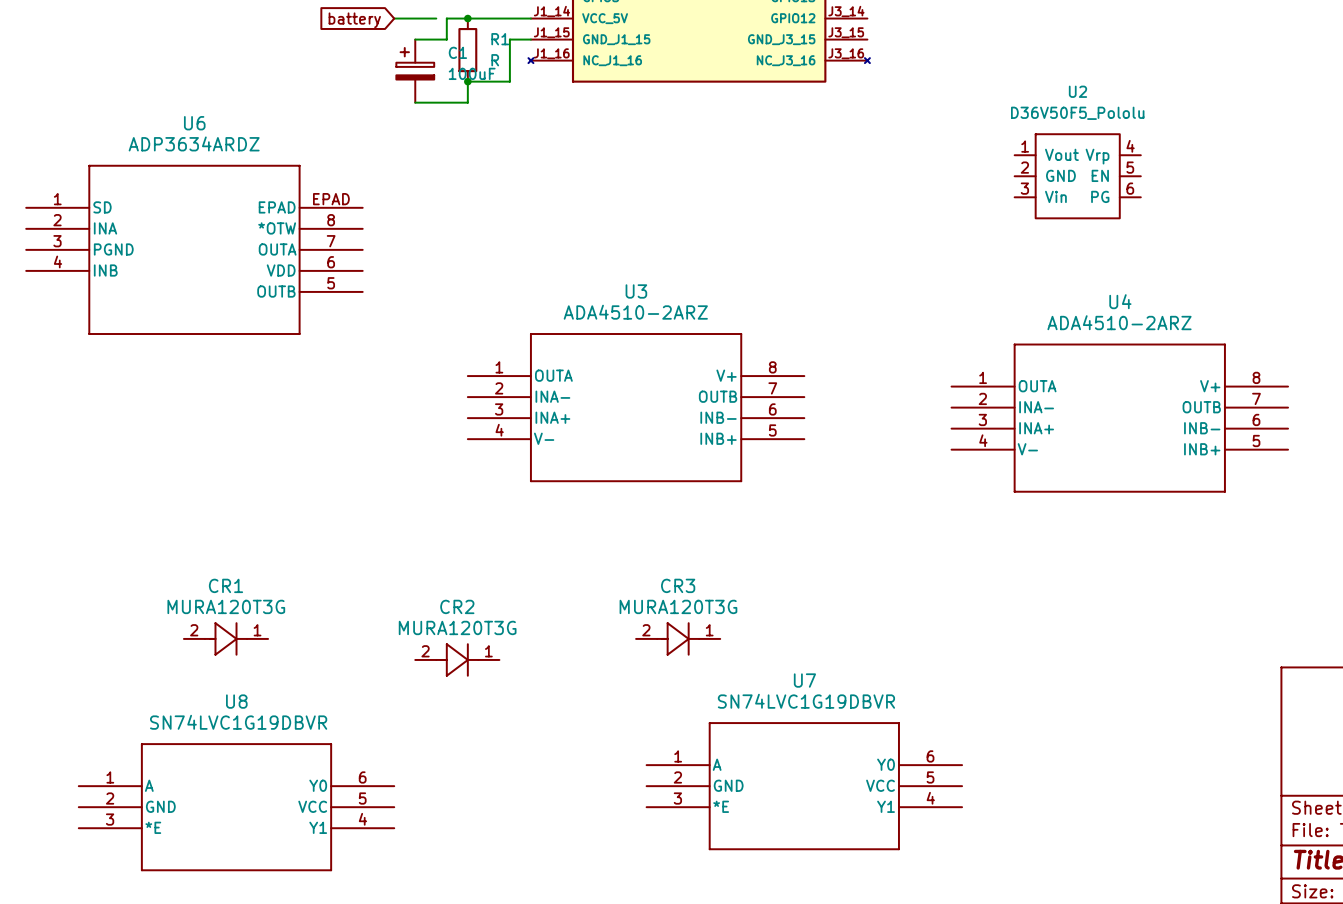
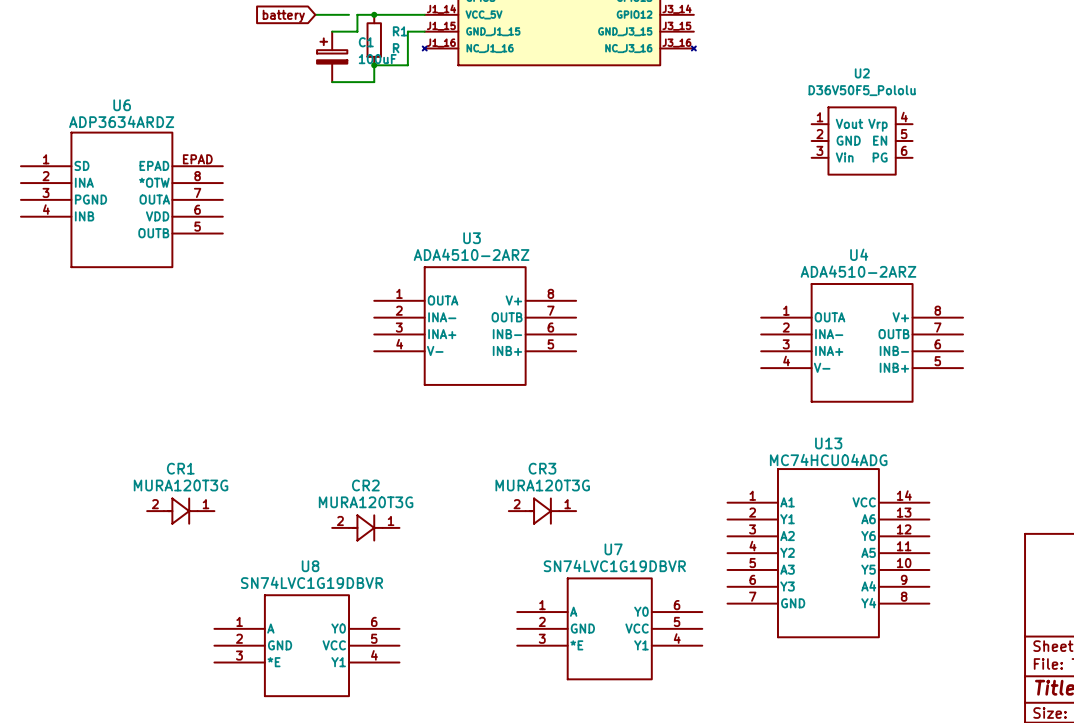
U6 symbol: [26, 165, 363, 335] -> [20, 132, 223, 268]
U3 symbol: [467, 333, 805, 482] -> [374, 266, 577, 386]
U4 symbol: [951, 343, 1289, 493] -> [761, 283, 964, 403]
U13: none -> MC74HCU04ADG (828, 553)
U7 symbol: [646, 722, 963, 850] -> [517, 577, 703, 680]
U8 symbol: [78, 743, 395, 871] -> [214, 594, 400, 697]

